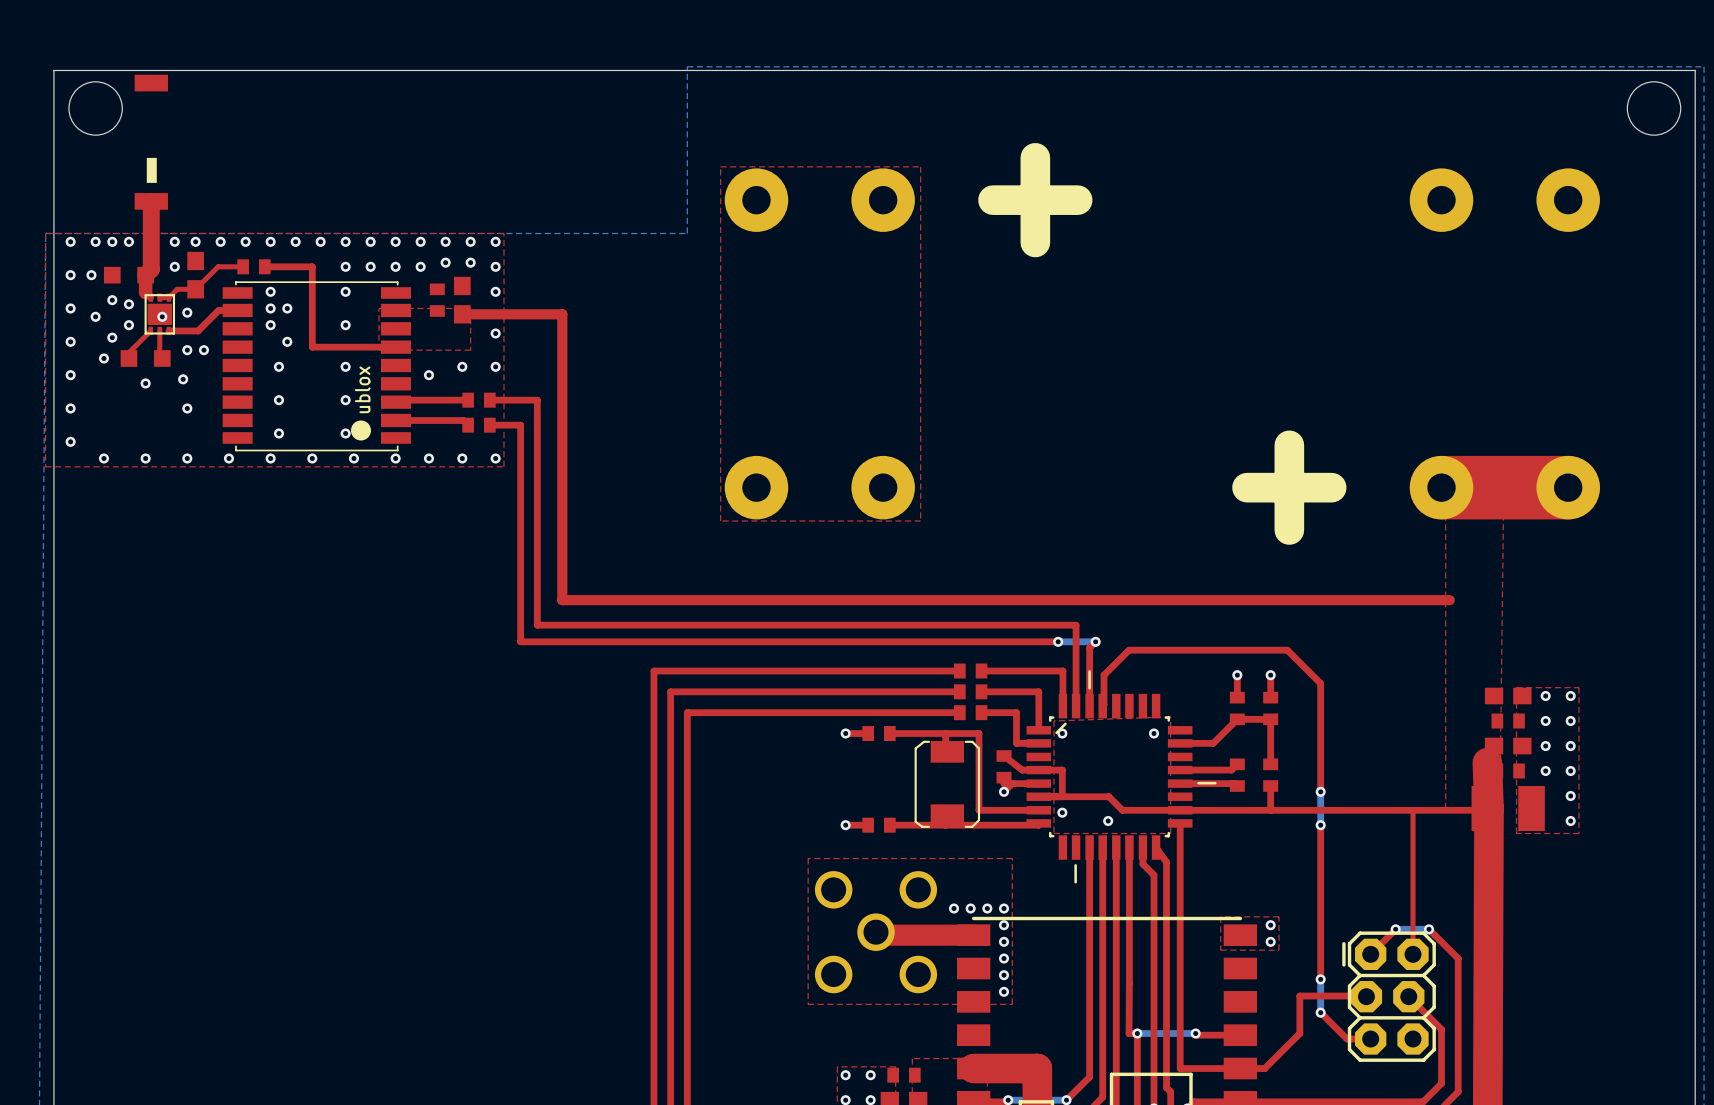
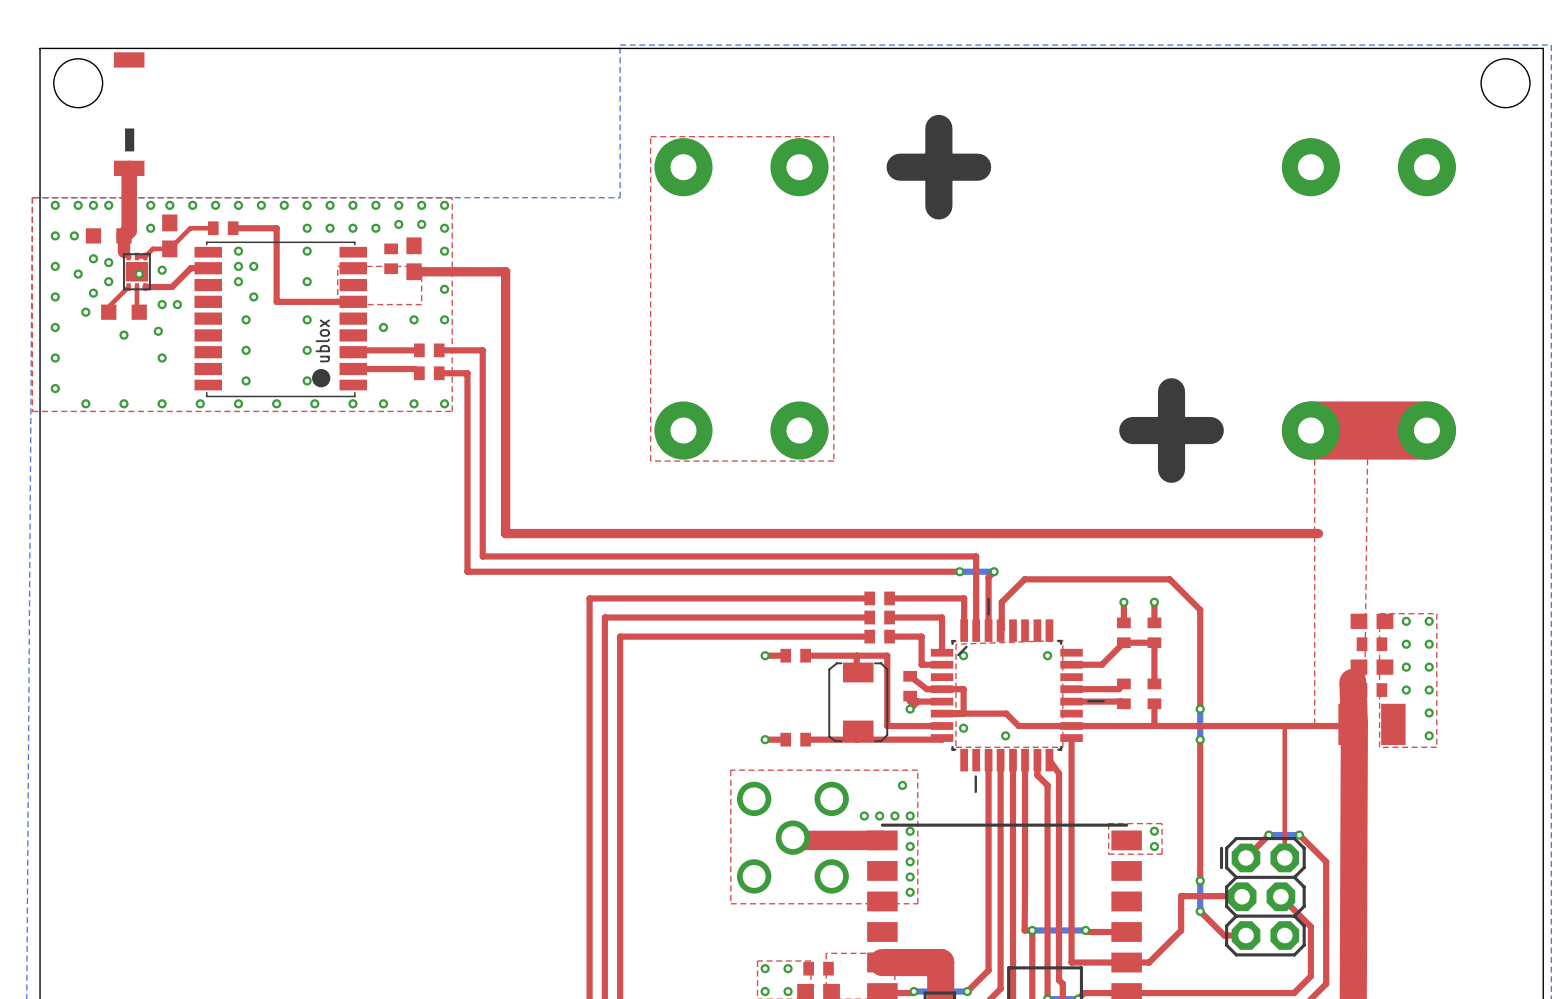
via: none -> (902, 785)

